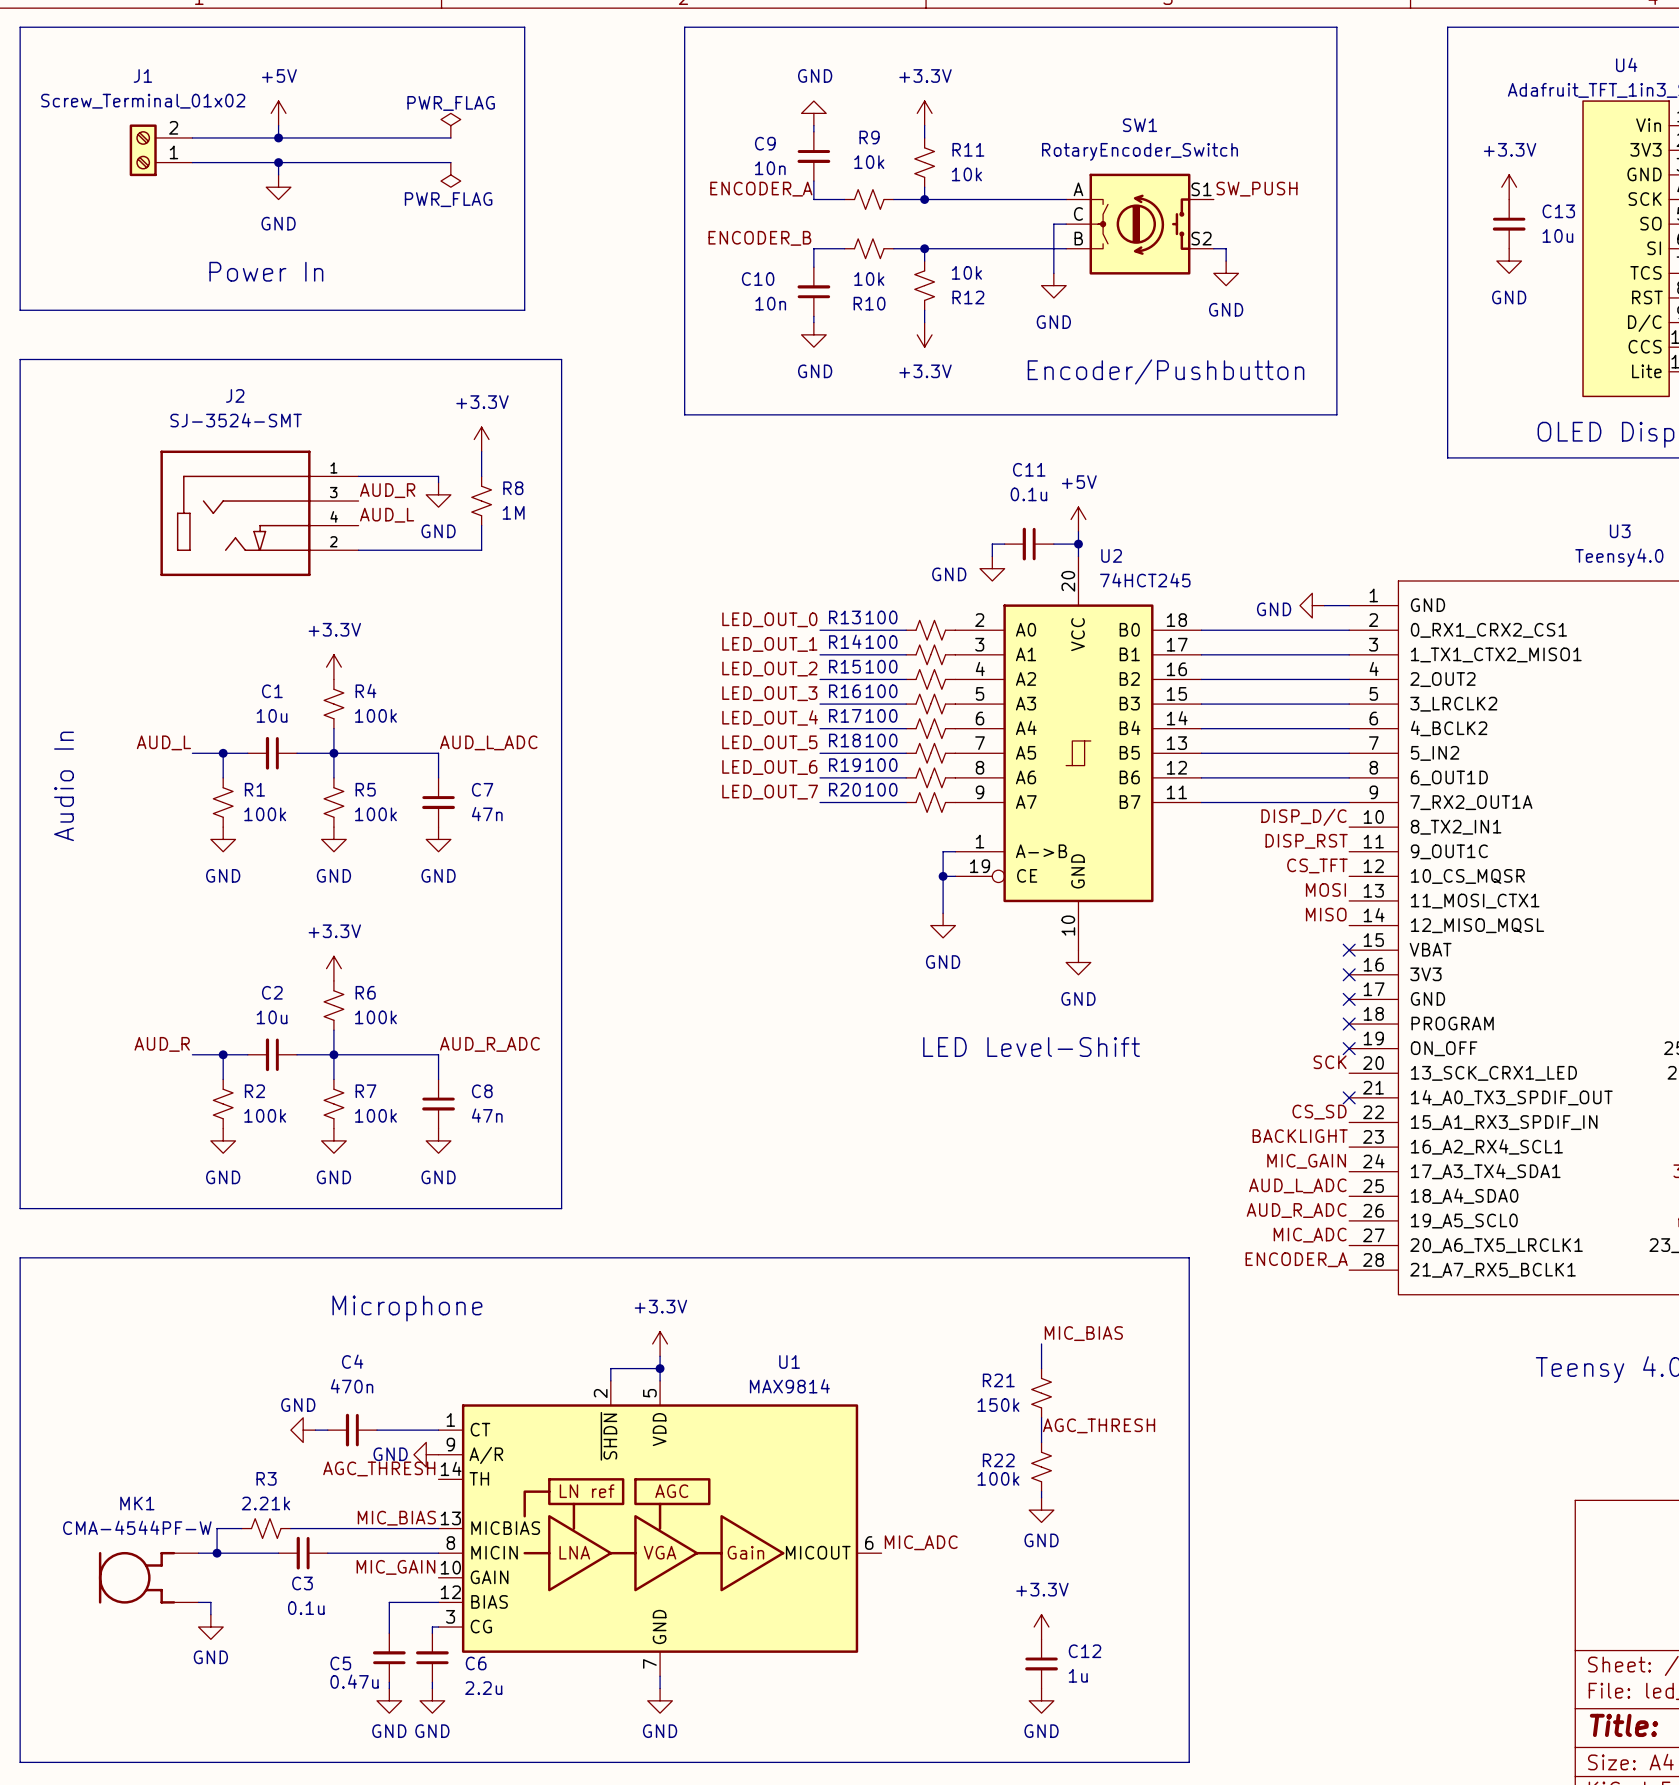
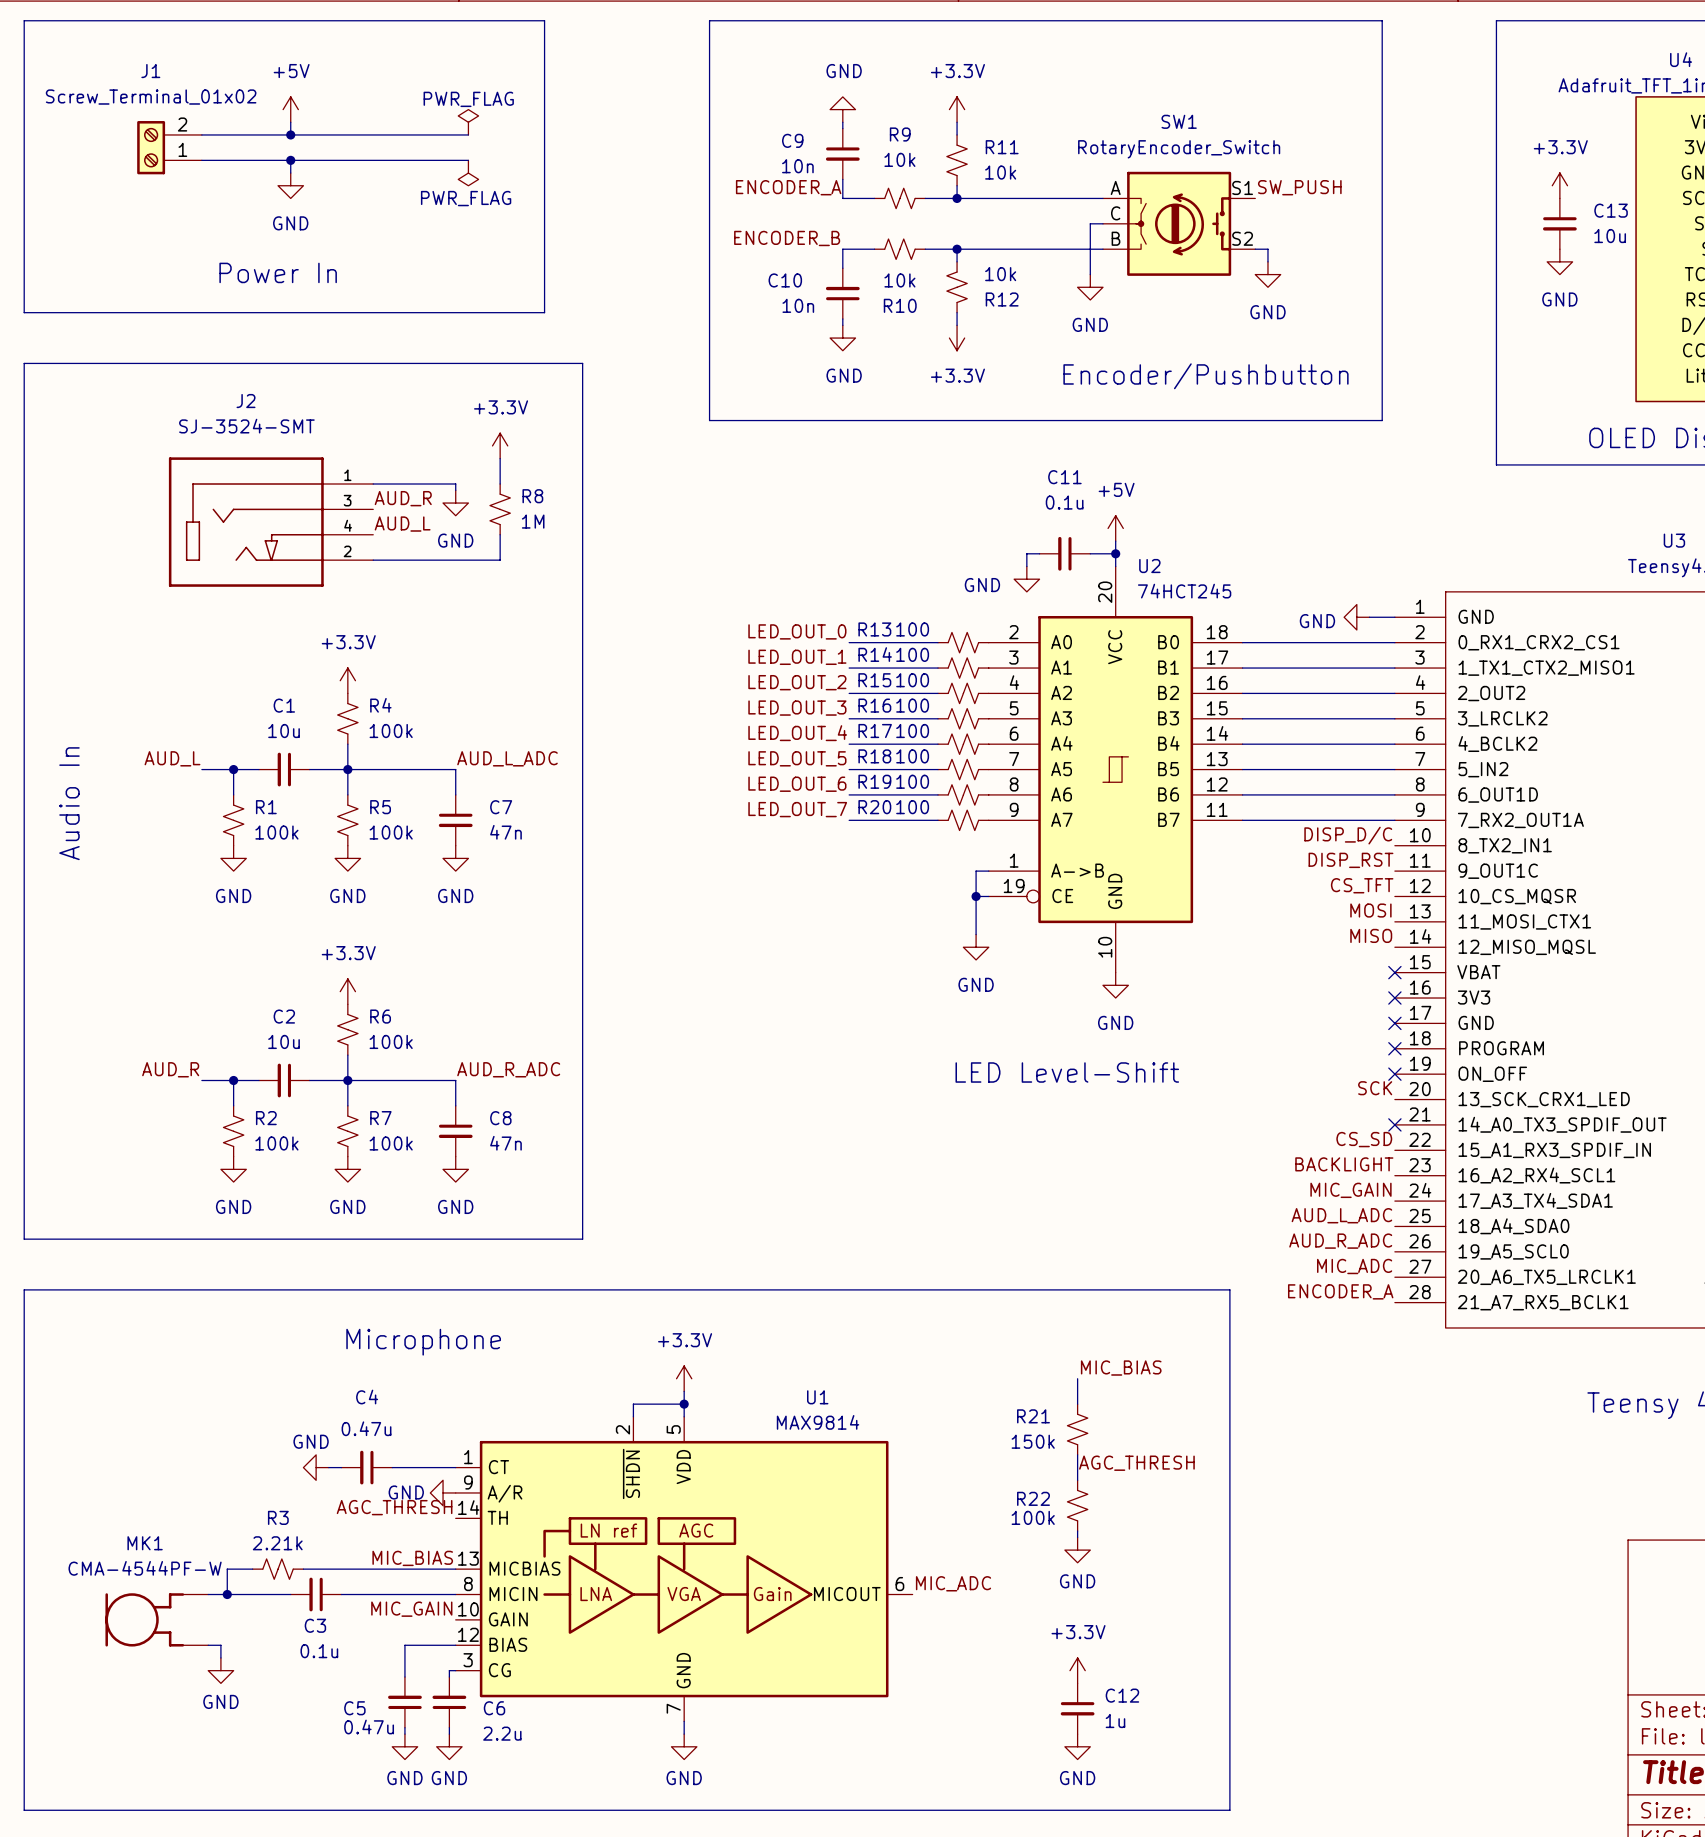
C4 value: 470n (352, 1386) -> 0.47u (366, 1428)

